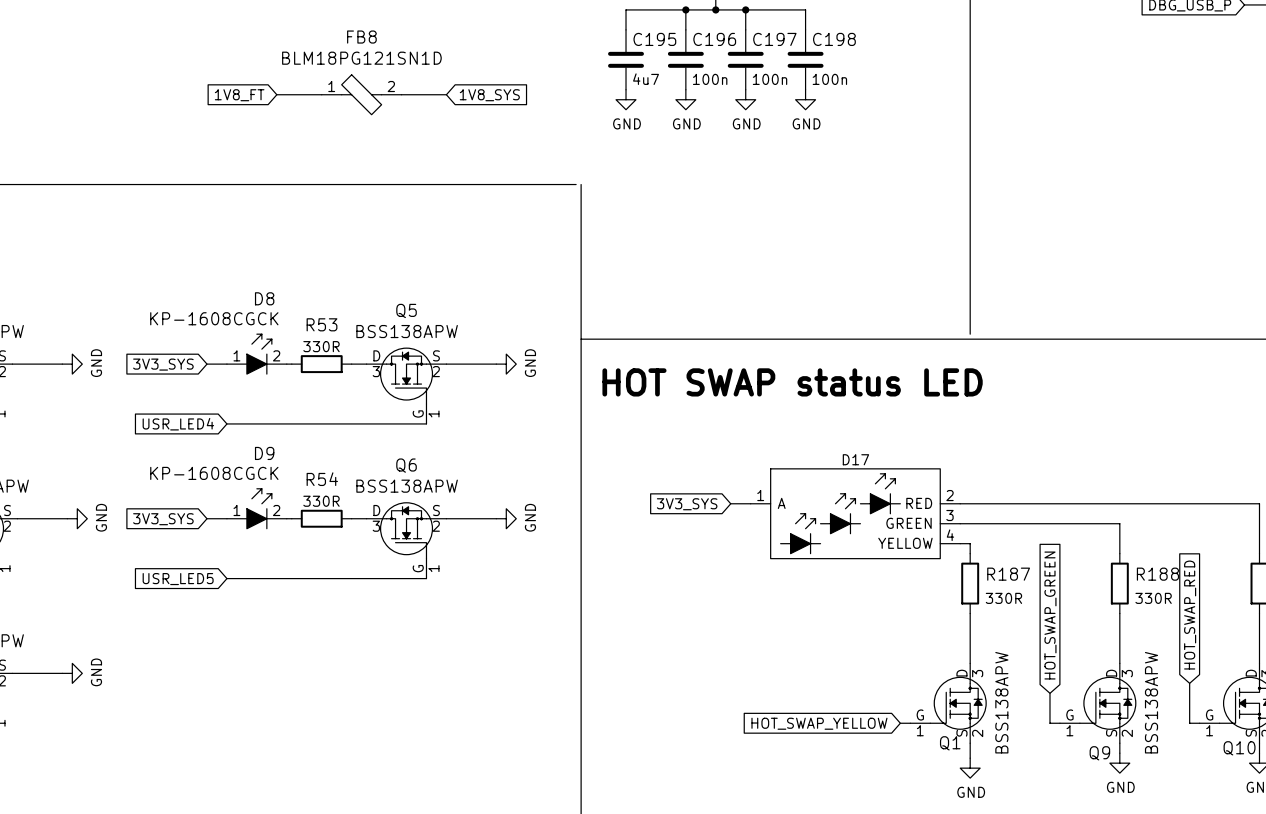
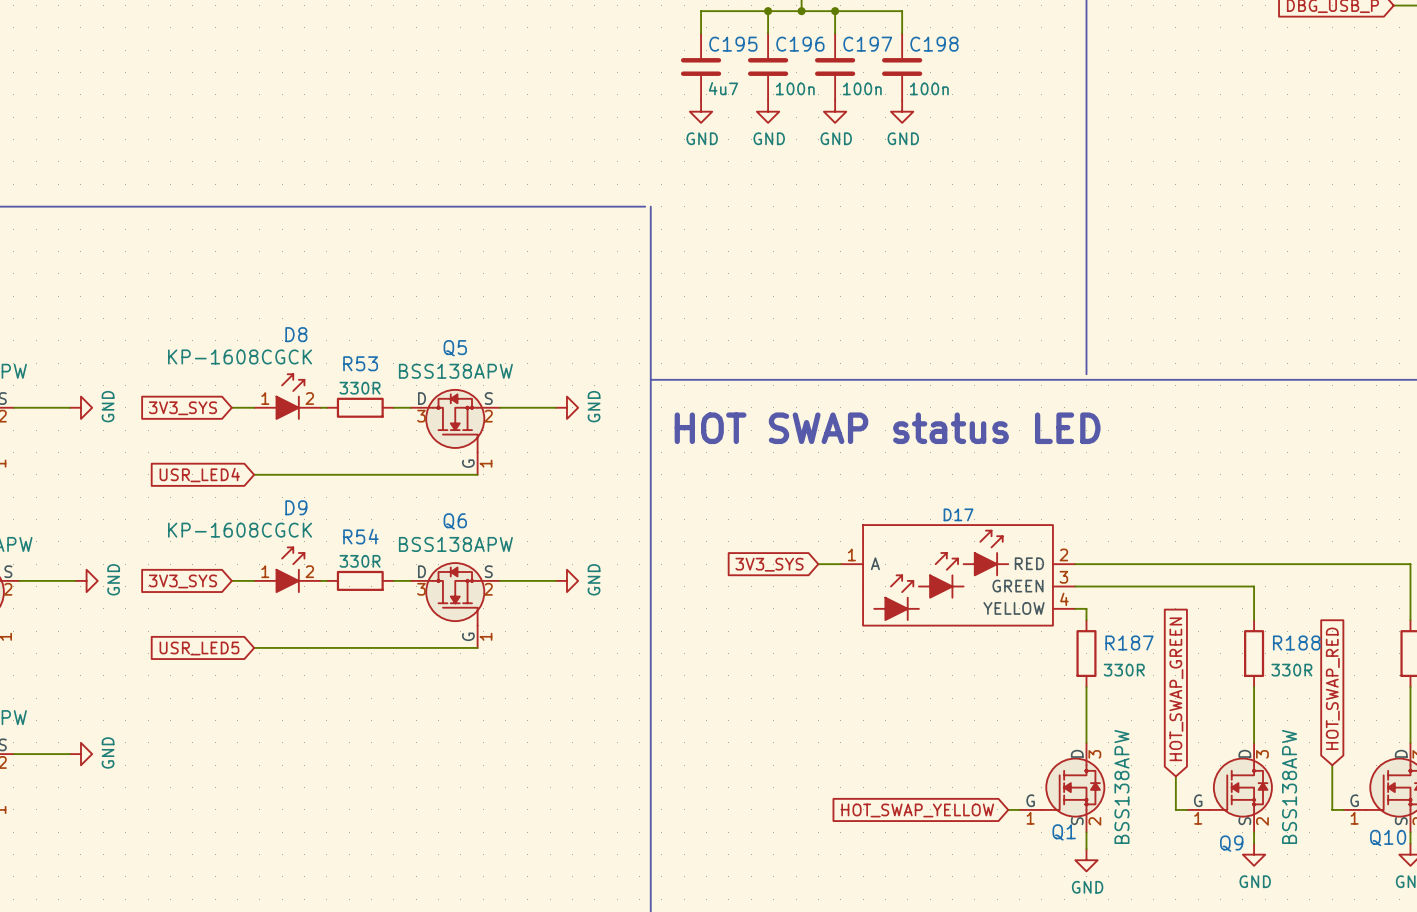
wire: (276, 94) (321, 94) -> none
FB8: BLM18PG121SN1D (361, 94) -> none
wire: (401, 94) (446, 94) -> none
global label: 1V8_FT (239, 95) -> none
global label: 1V8_SYS (489, 95) -> none

